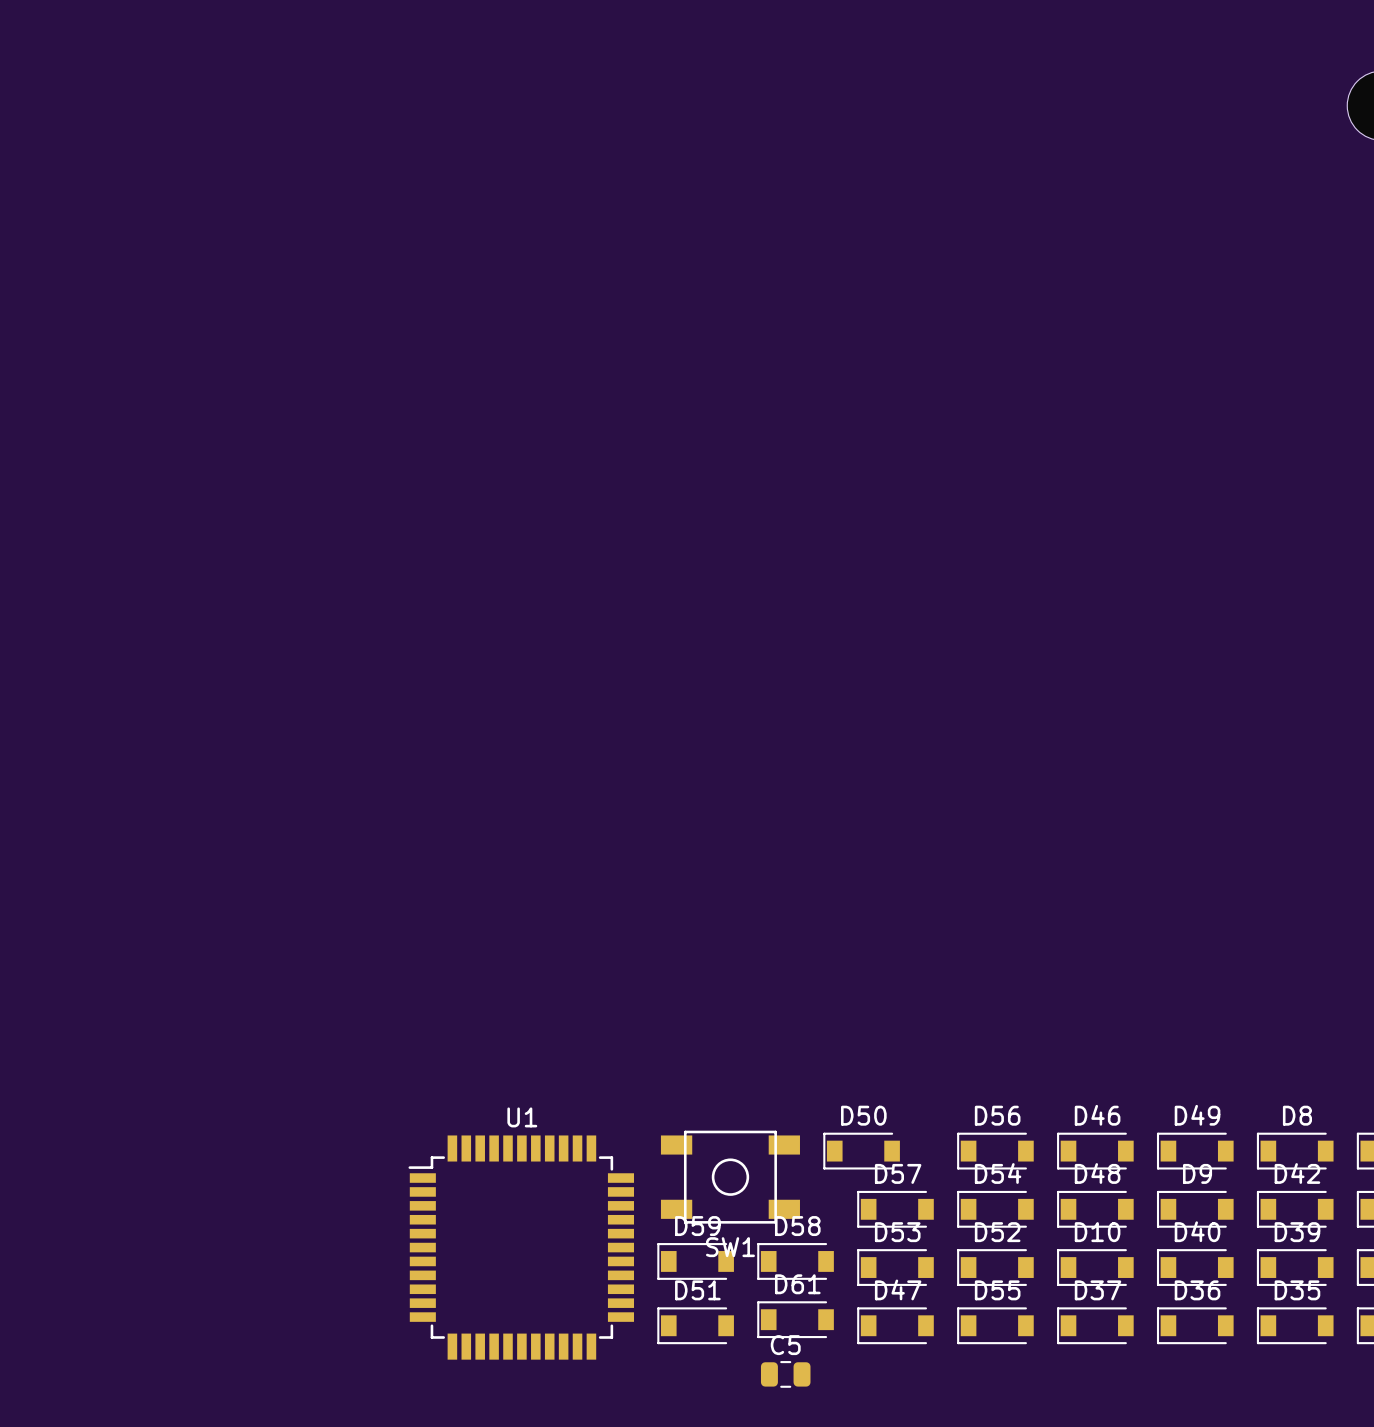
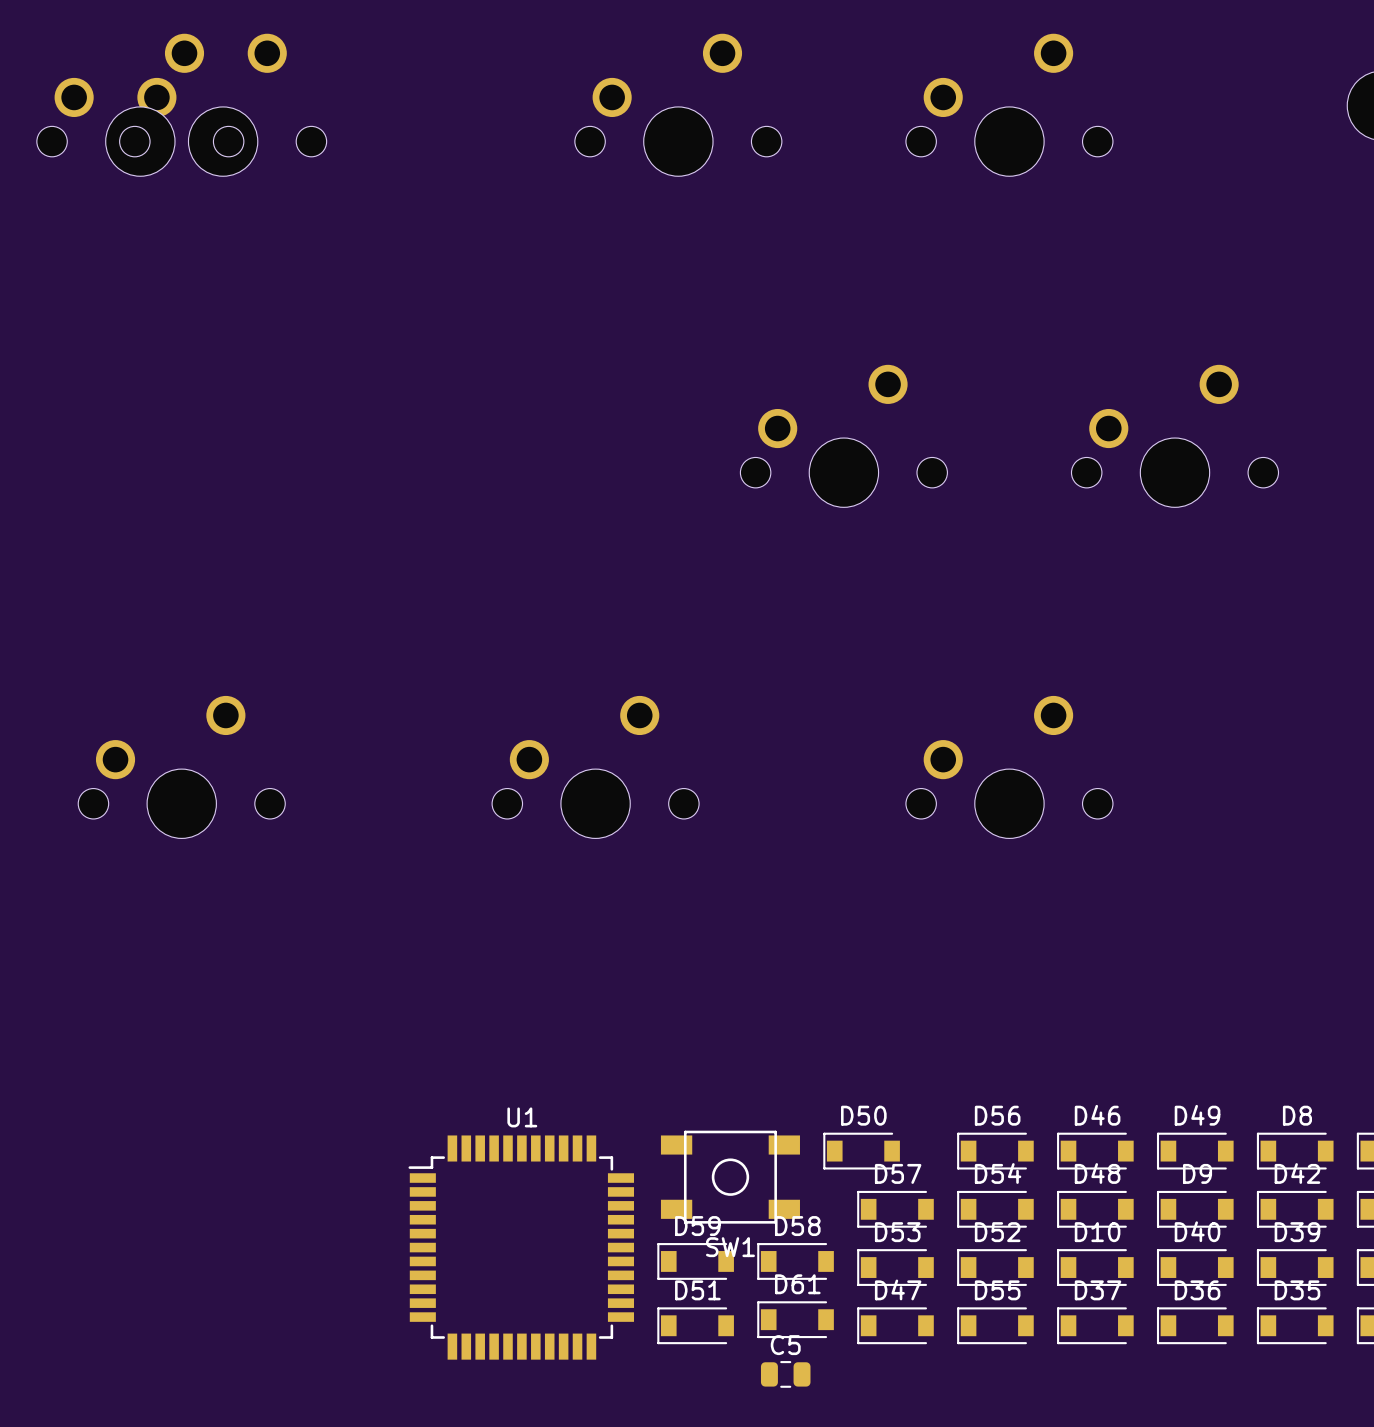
part: none -> (140, 105)
part: none -> (223, 105)
part: none -> (678, 105)
part: none -> (1009, 105)
part: none -> (843, 436)
part: none -> (1174, 436)
part: none -> (181, 767)
part: none -> (595, 767)
part: none -> (1009, 767)

